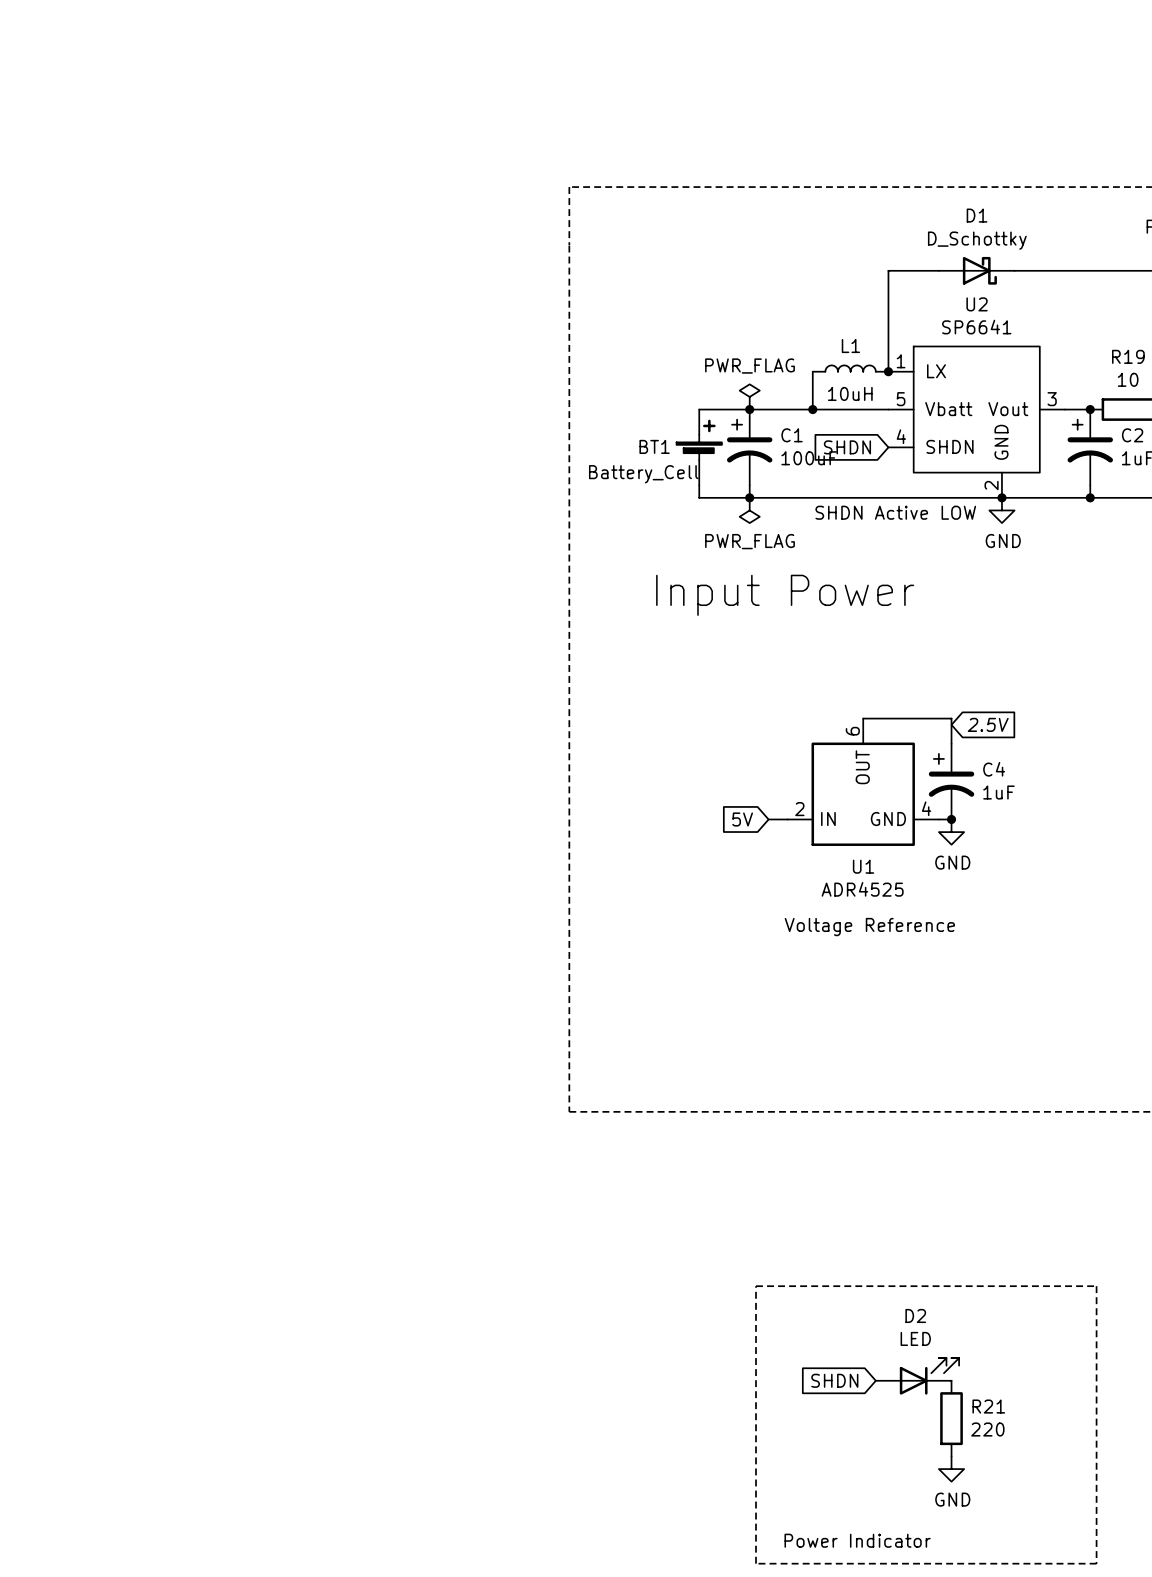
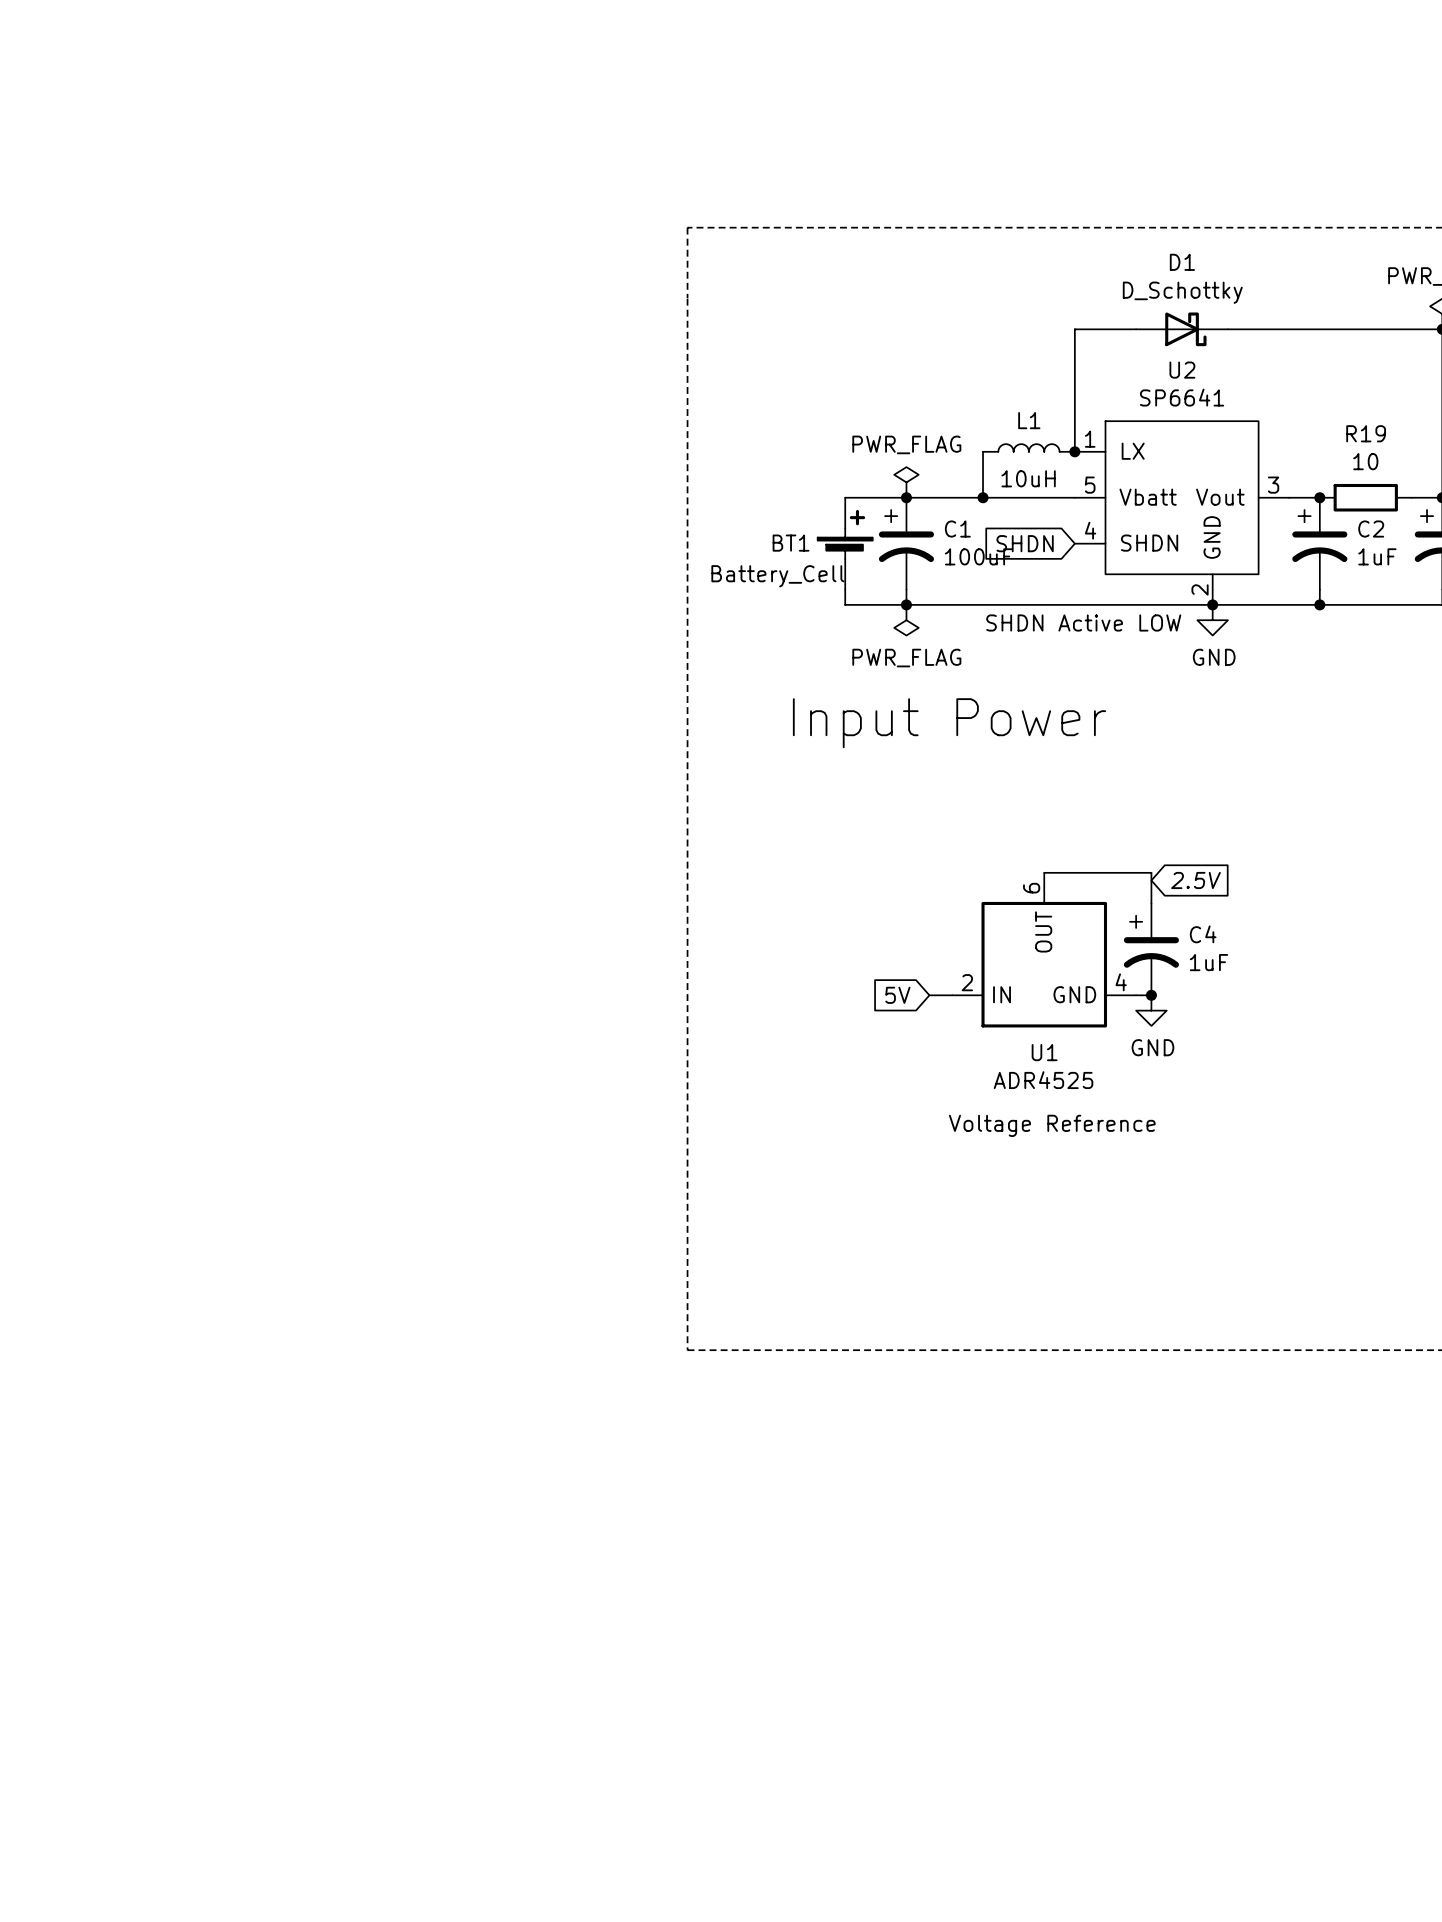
line: (756, 1286) (756, 1563) (1096, 1563) (1096, 1286) (756, 1286) -> none
D2: LED (917, 1376) -> none
global label: SHDN (834, 1380) -> none
R21: 220 (951, 1418) -> none
power symbol: GND (951, 1469) -> none
text: Power Indicator (857, 1540) -> none

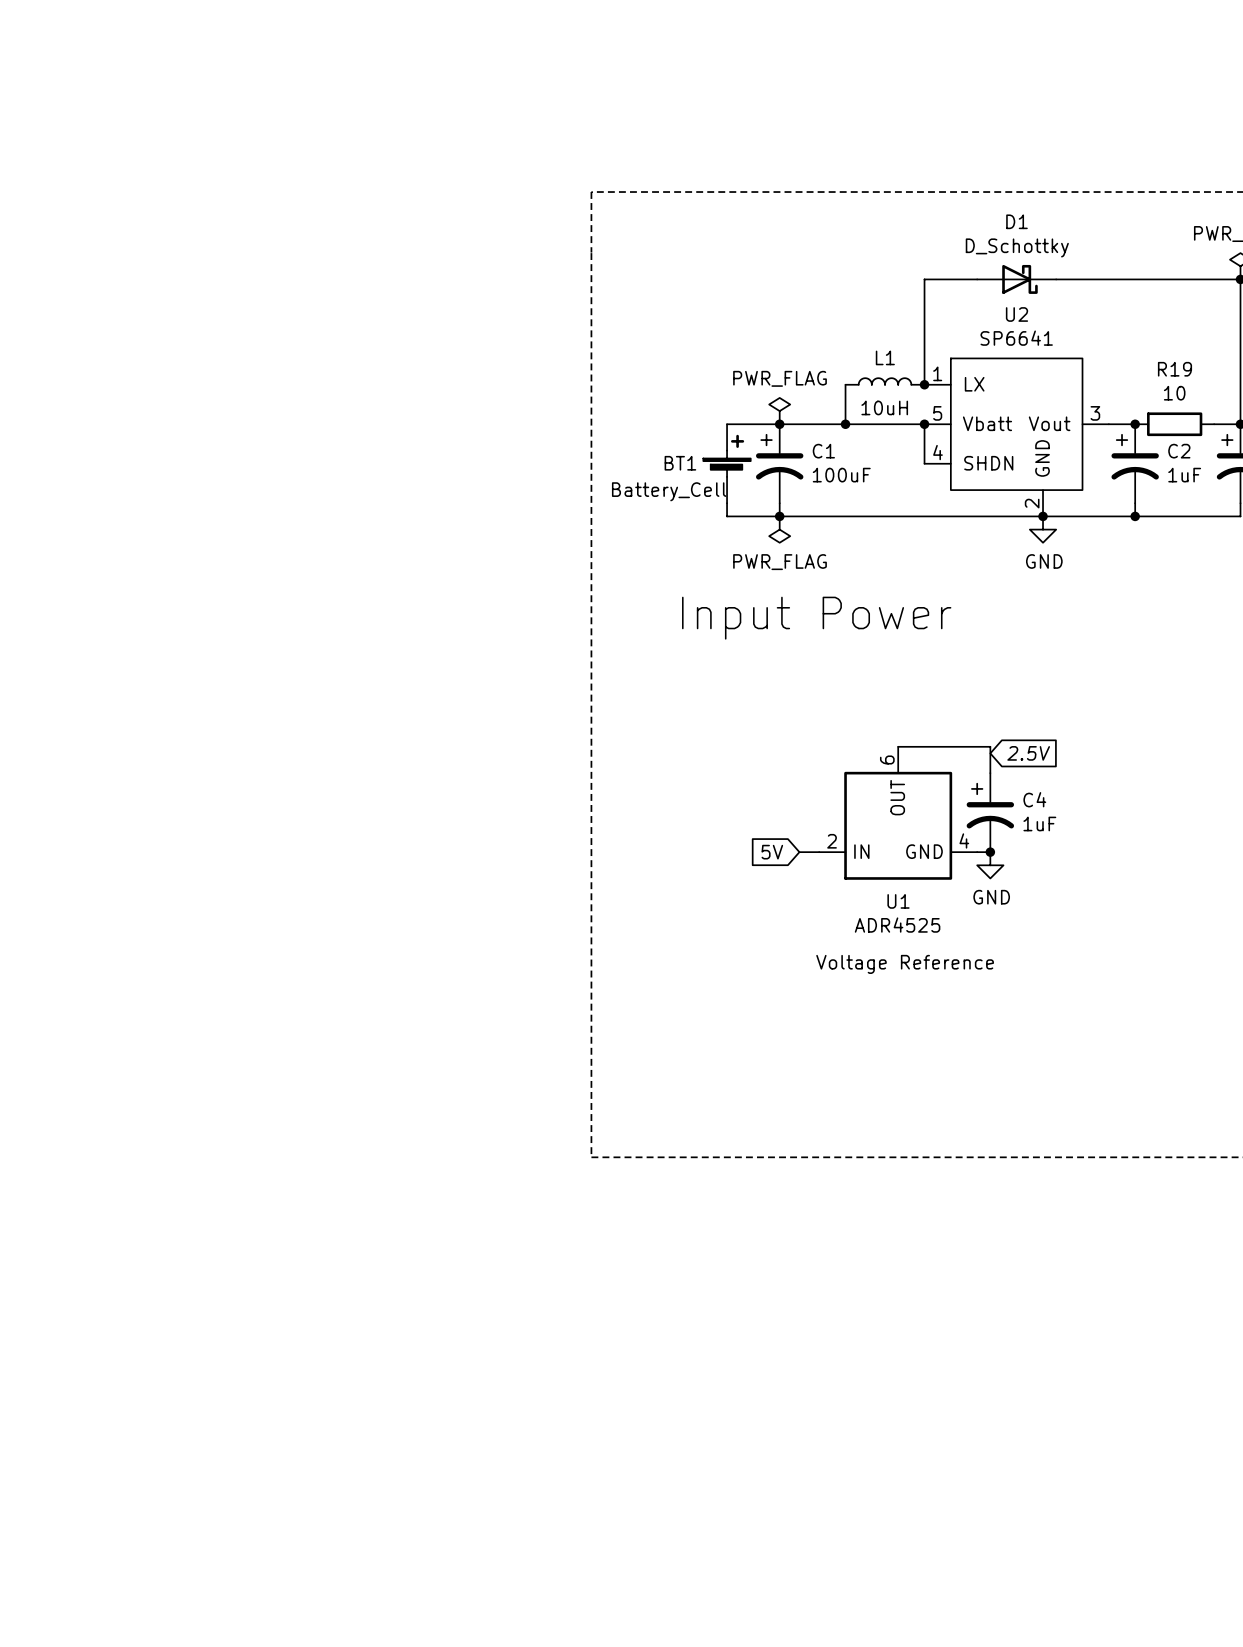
wire: none -> (924, 424) (924, 463)
junction: none -> (924, 424)
global label: SHDN (1025, 543) -> none
text: SHDN Active LOW (1083, 622) -> none

